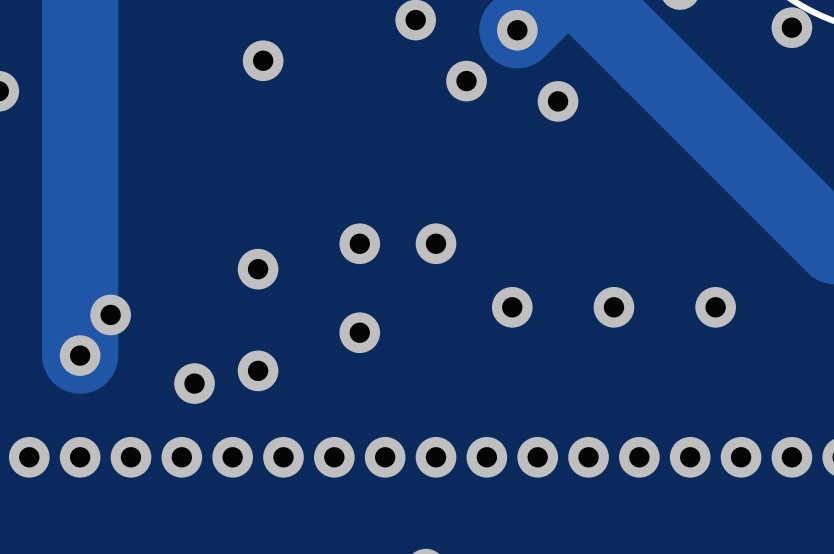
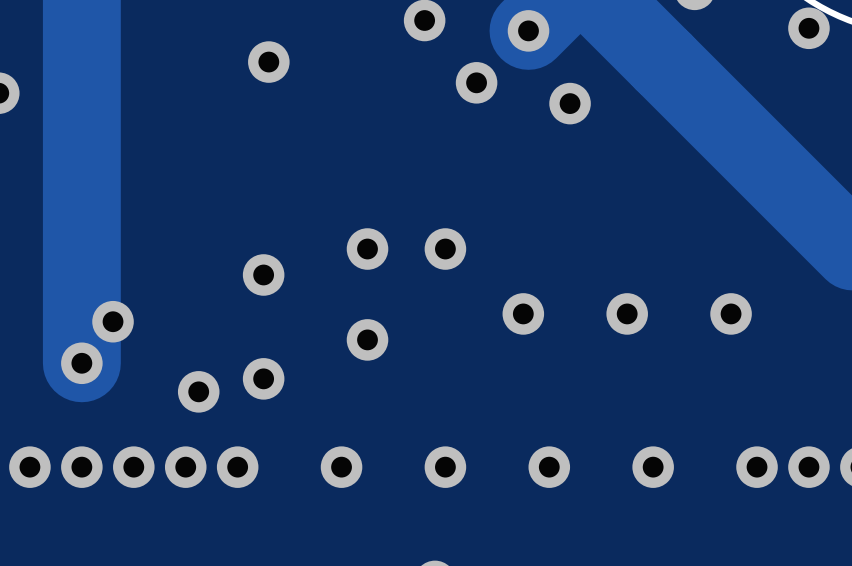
via: (283, 457) -> none
via: (385, 457) -> none
via: (486, 457) -> none
via: (588, 457) -> none
via: (690, 457) -> none

